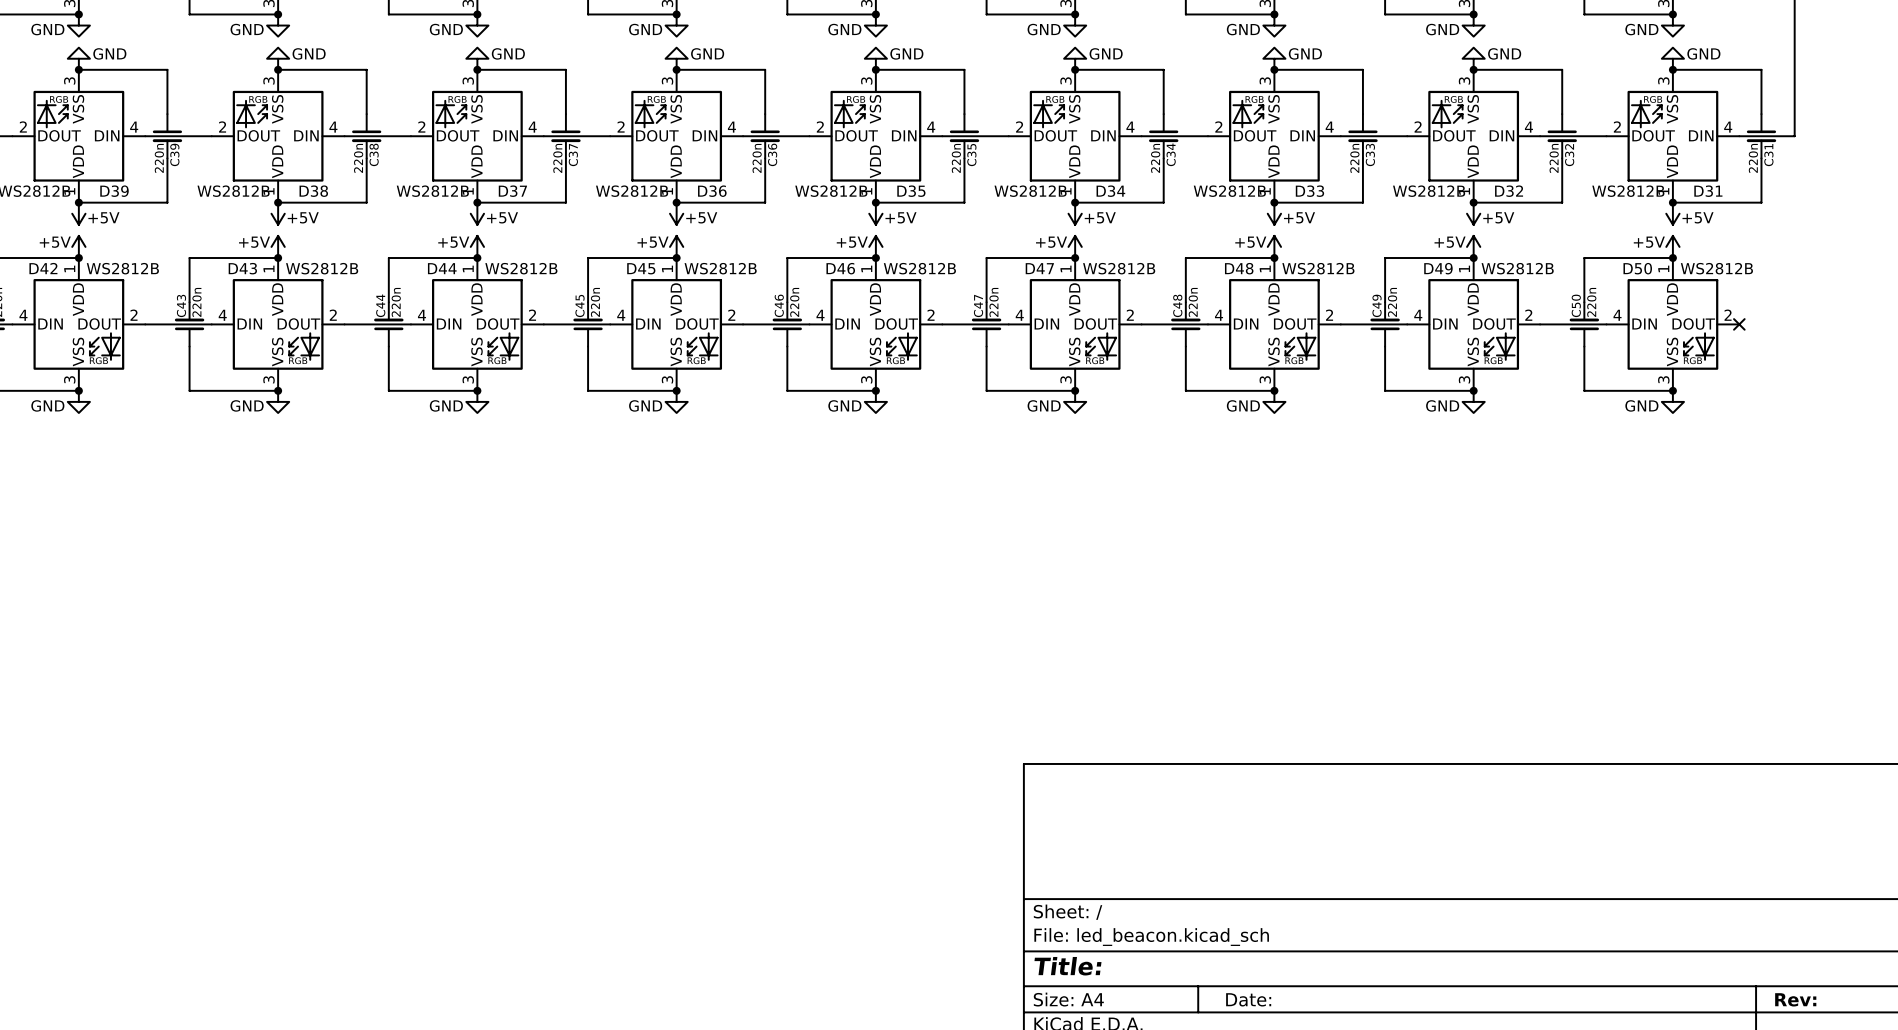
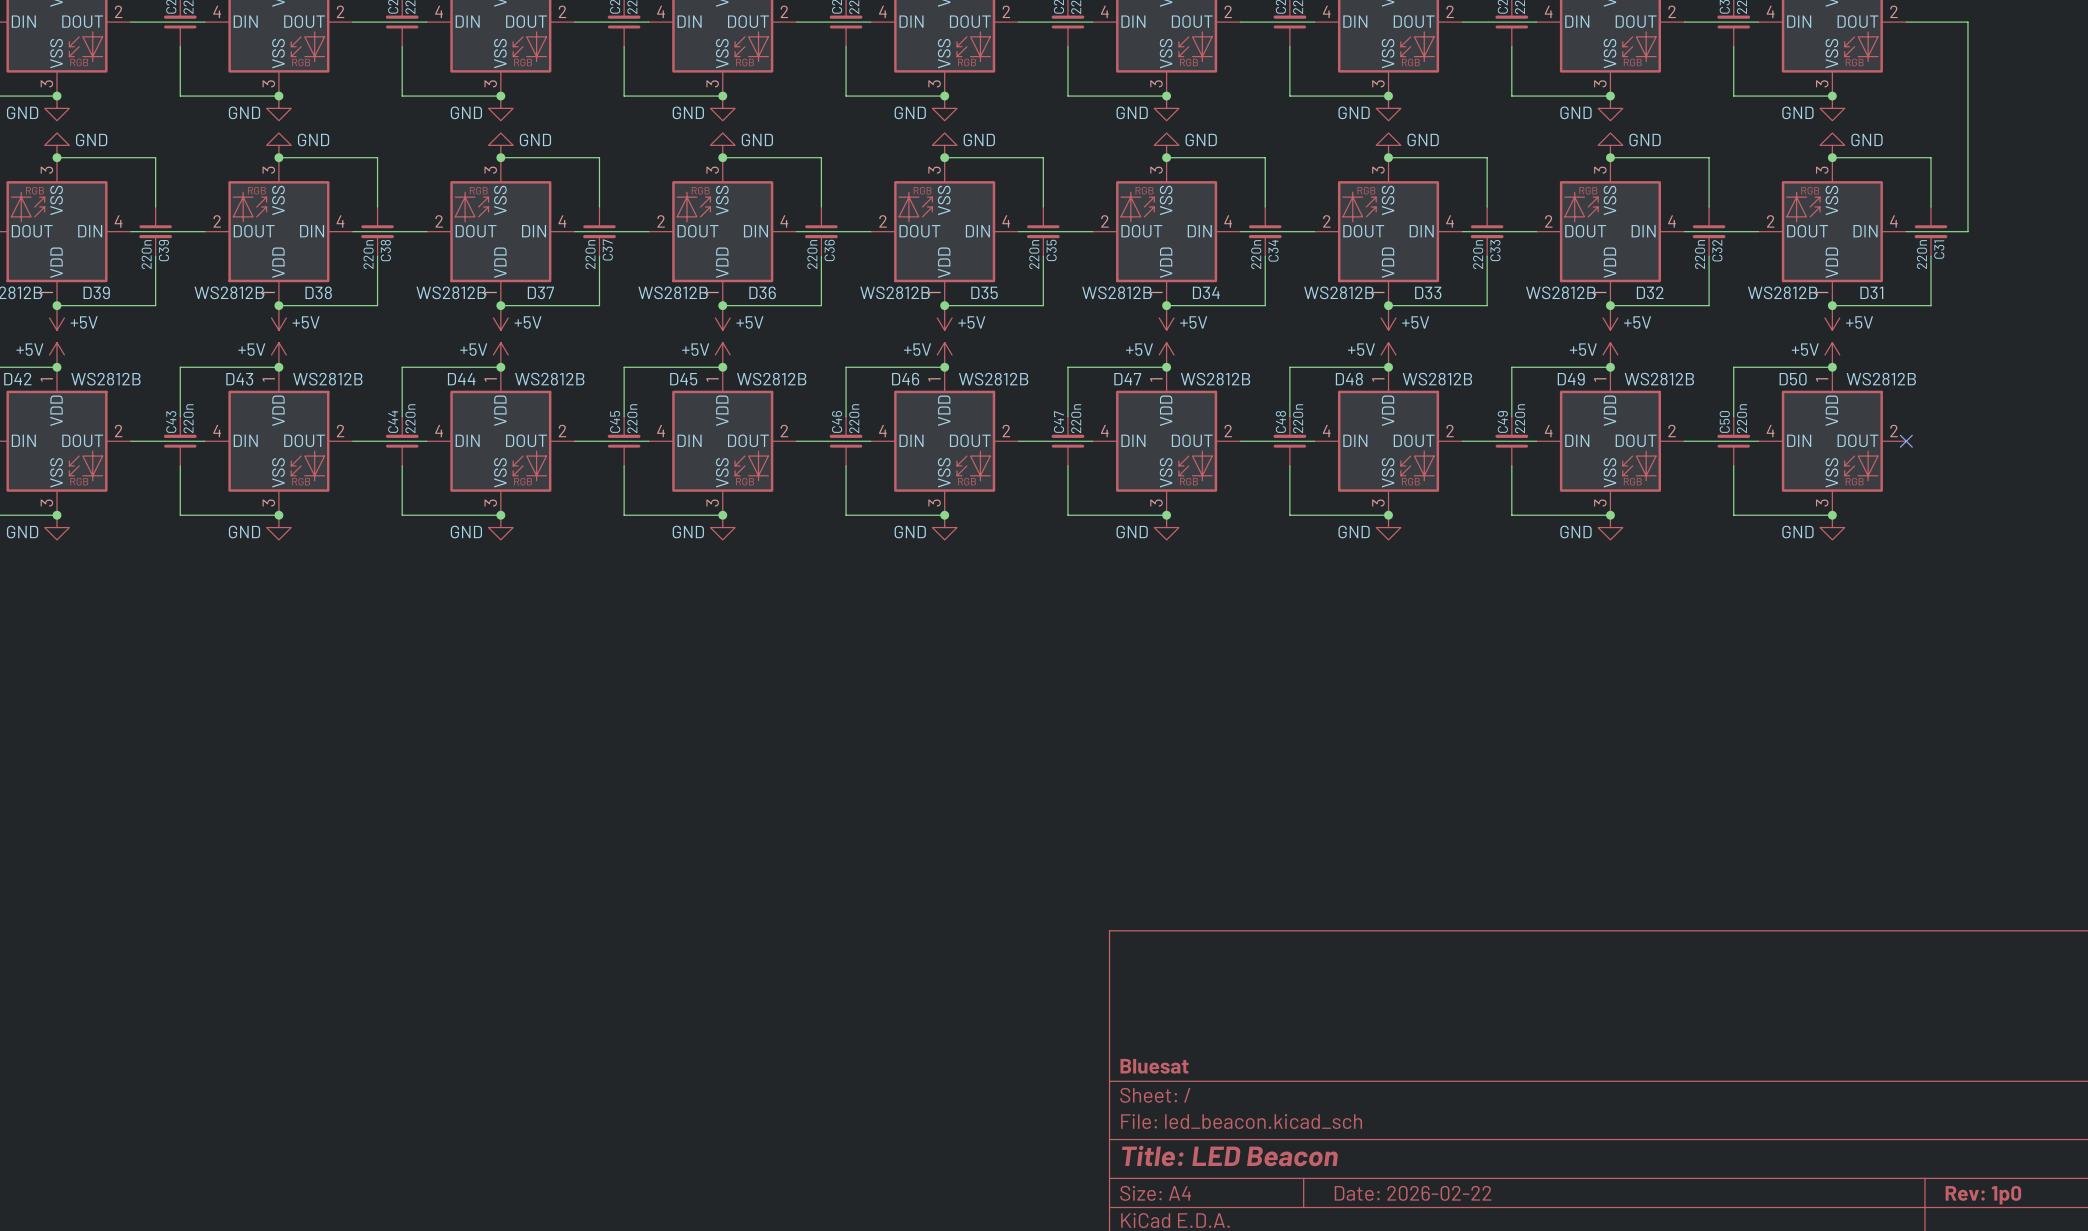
title block: none -> Bluesat (1154, 1066)
title block: Title: (1067, 966) -> Title: LED Beacon (1230, 1155)
title block: Date: (1248, 999) -> Date: 2026-02-22 (1413, 1193)
title block: Rev: (1795, 999) -> Rev: 1p0 (1983, 1195)

